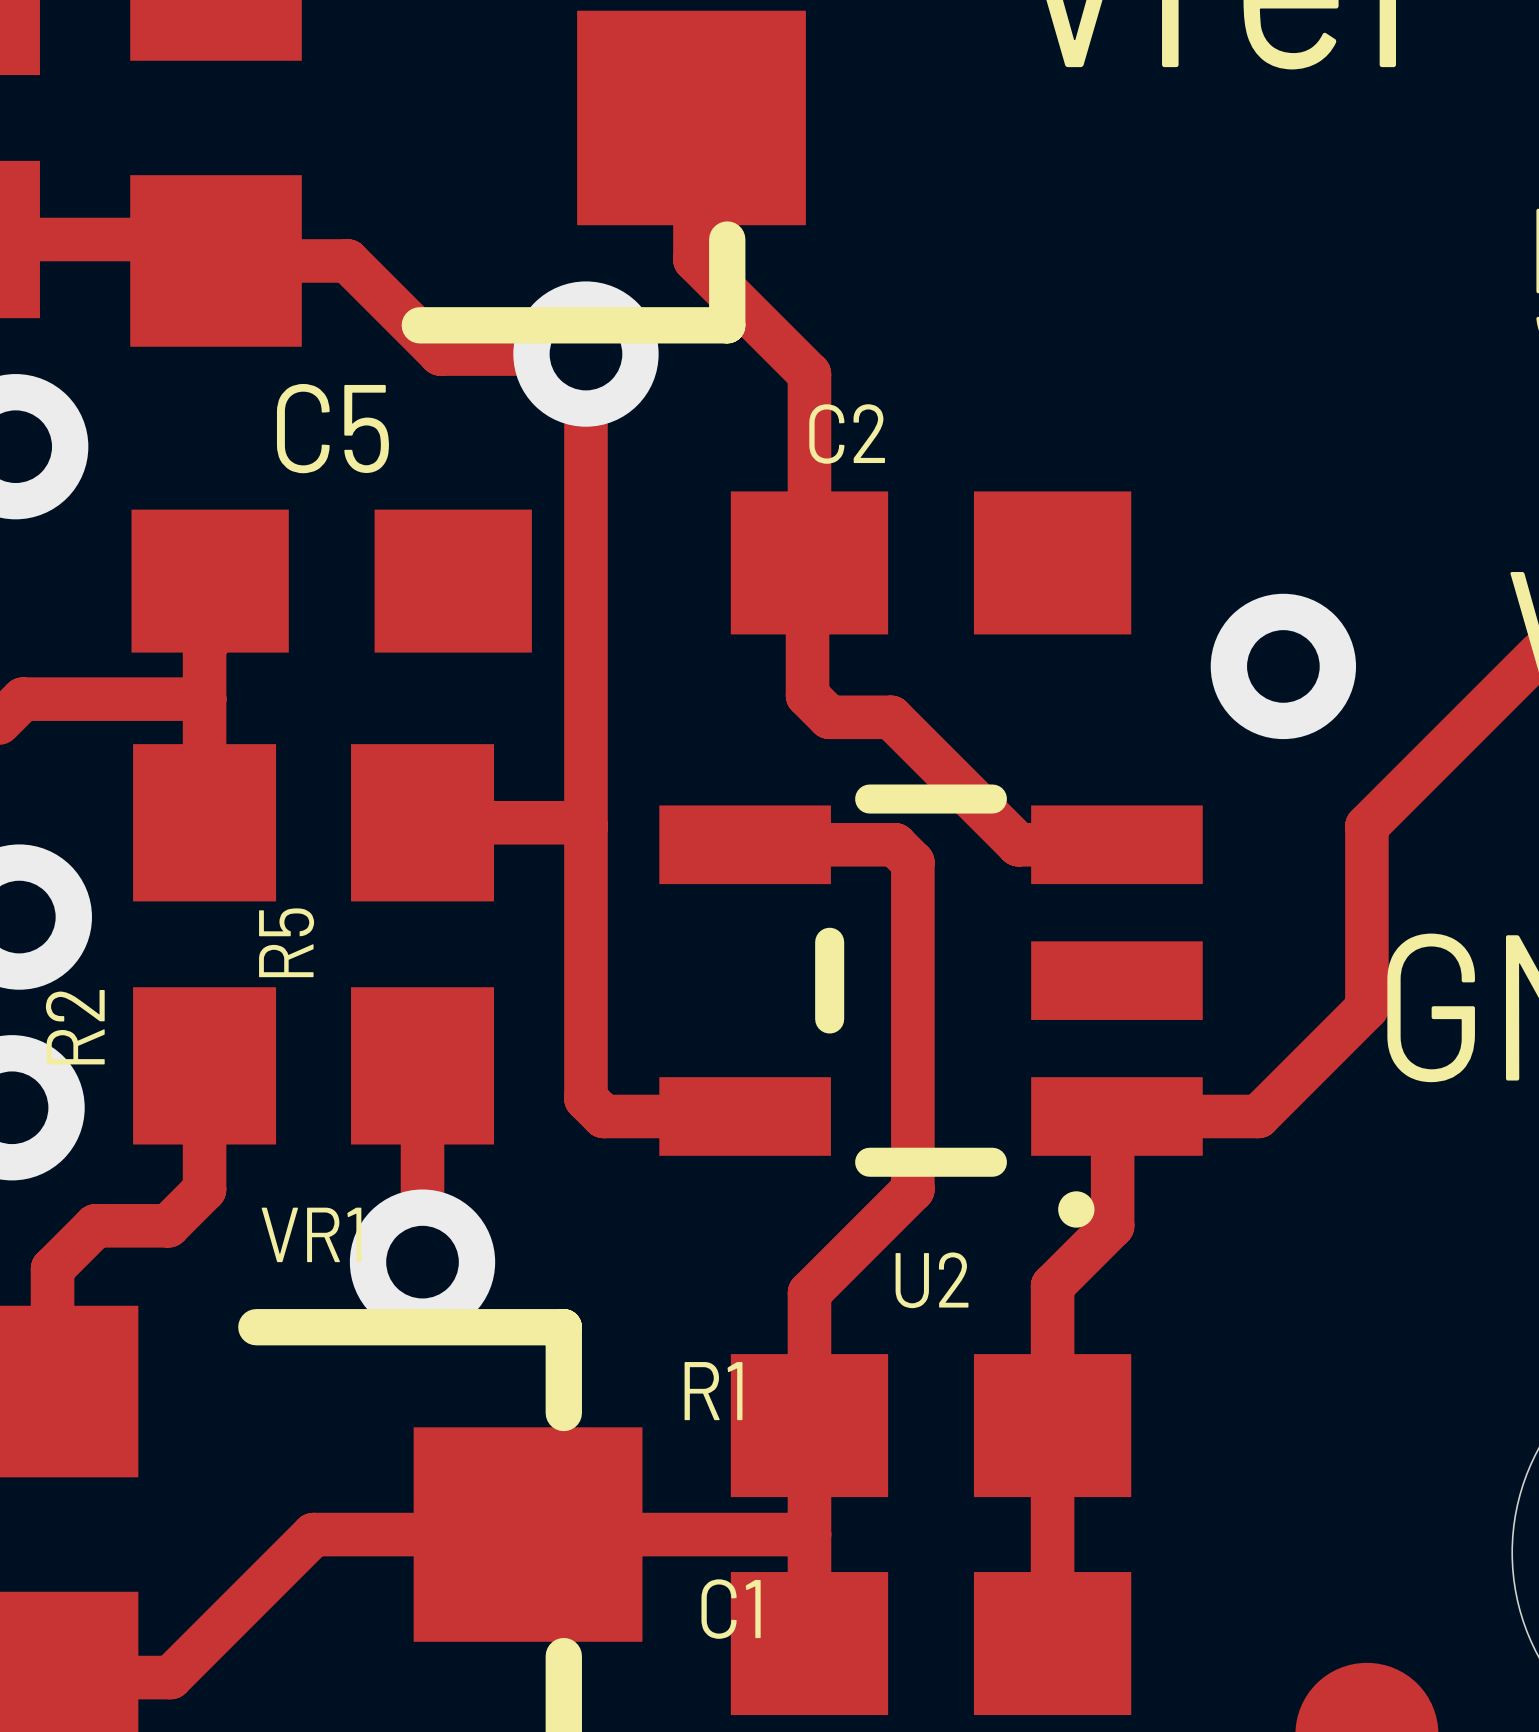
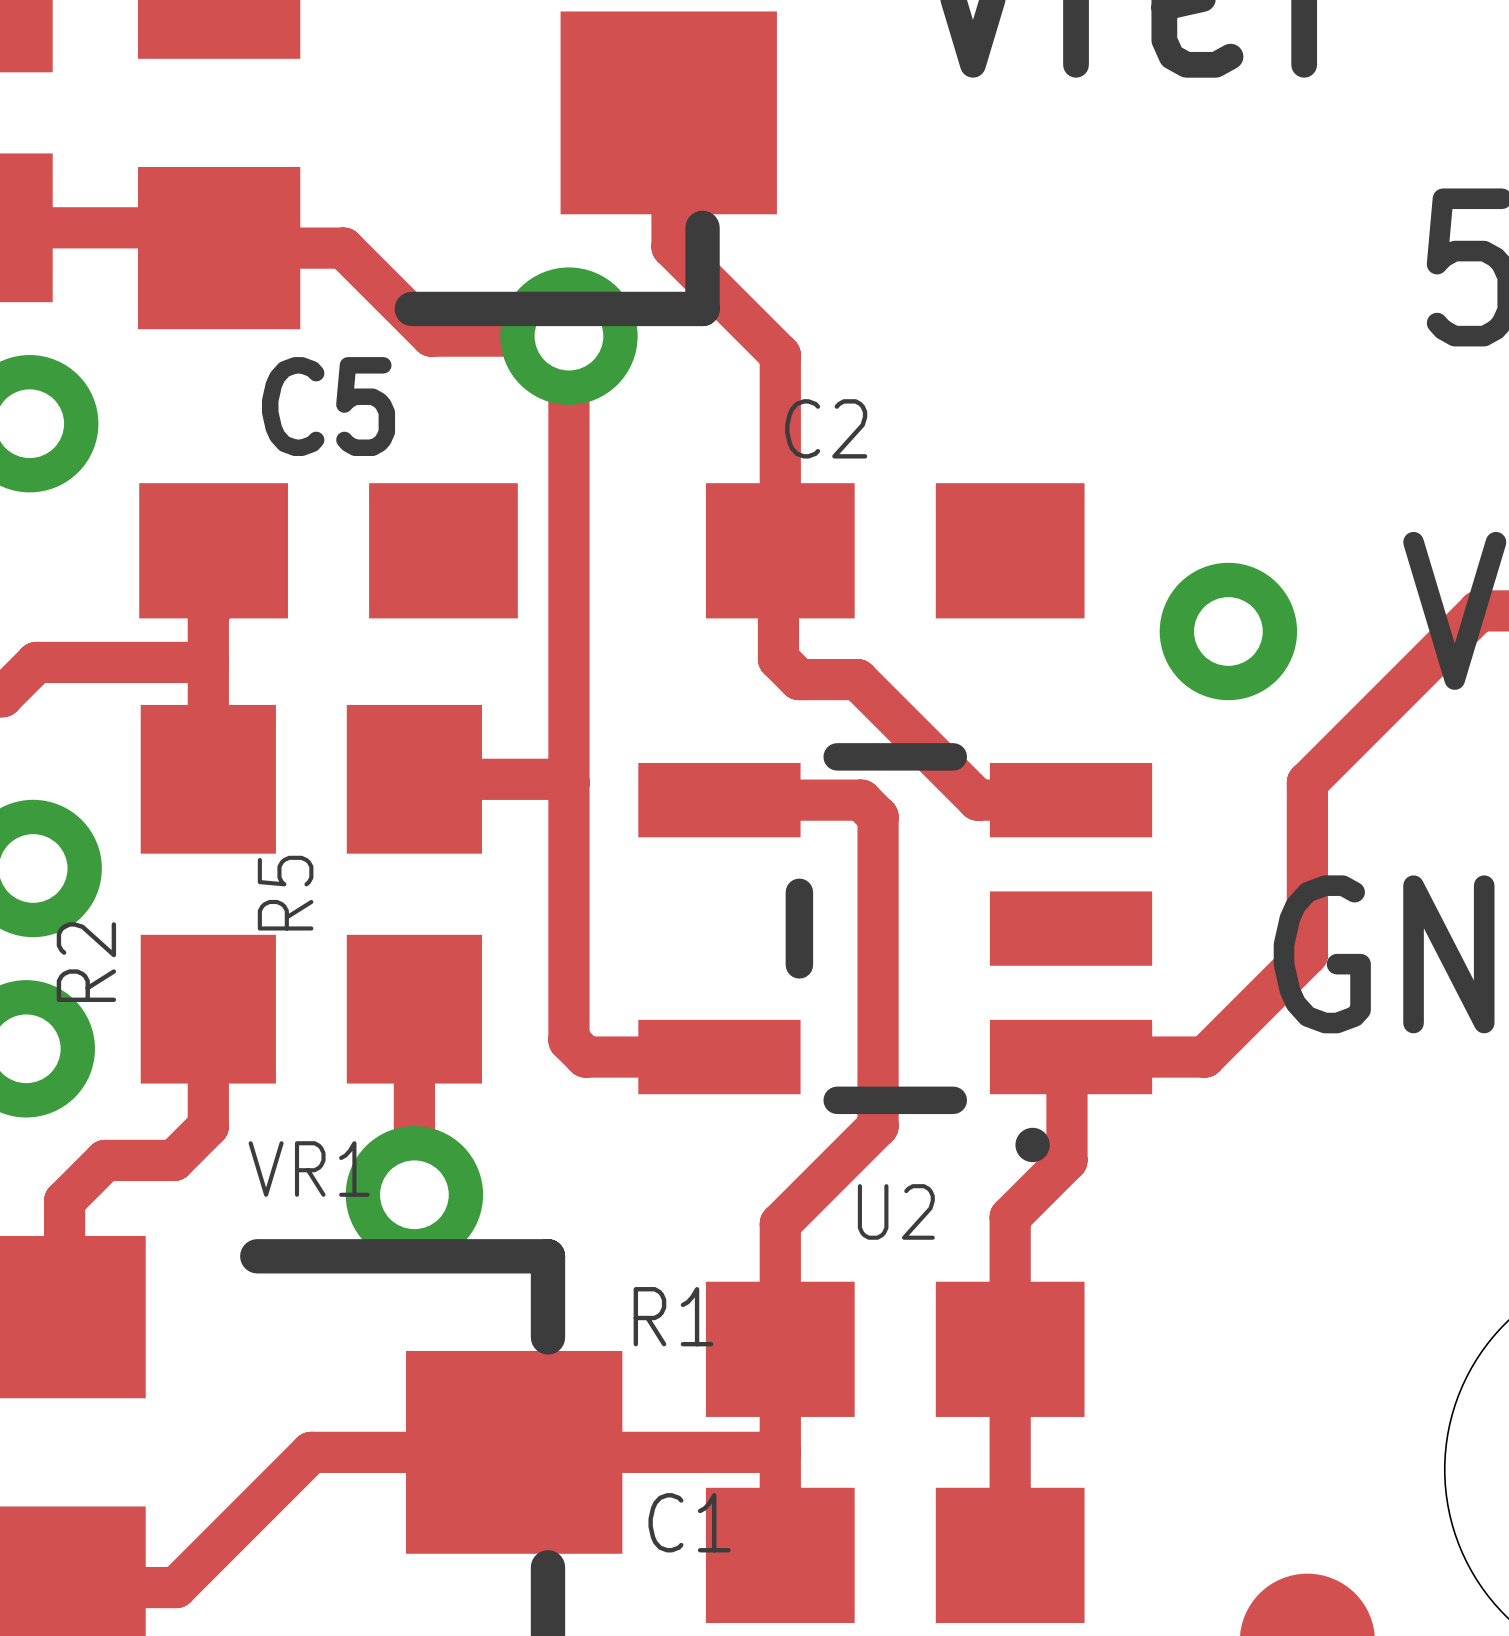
C2 position: (931, 562) -> (895, 550)

